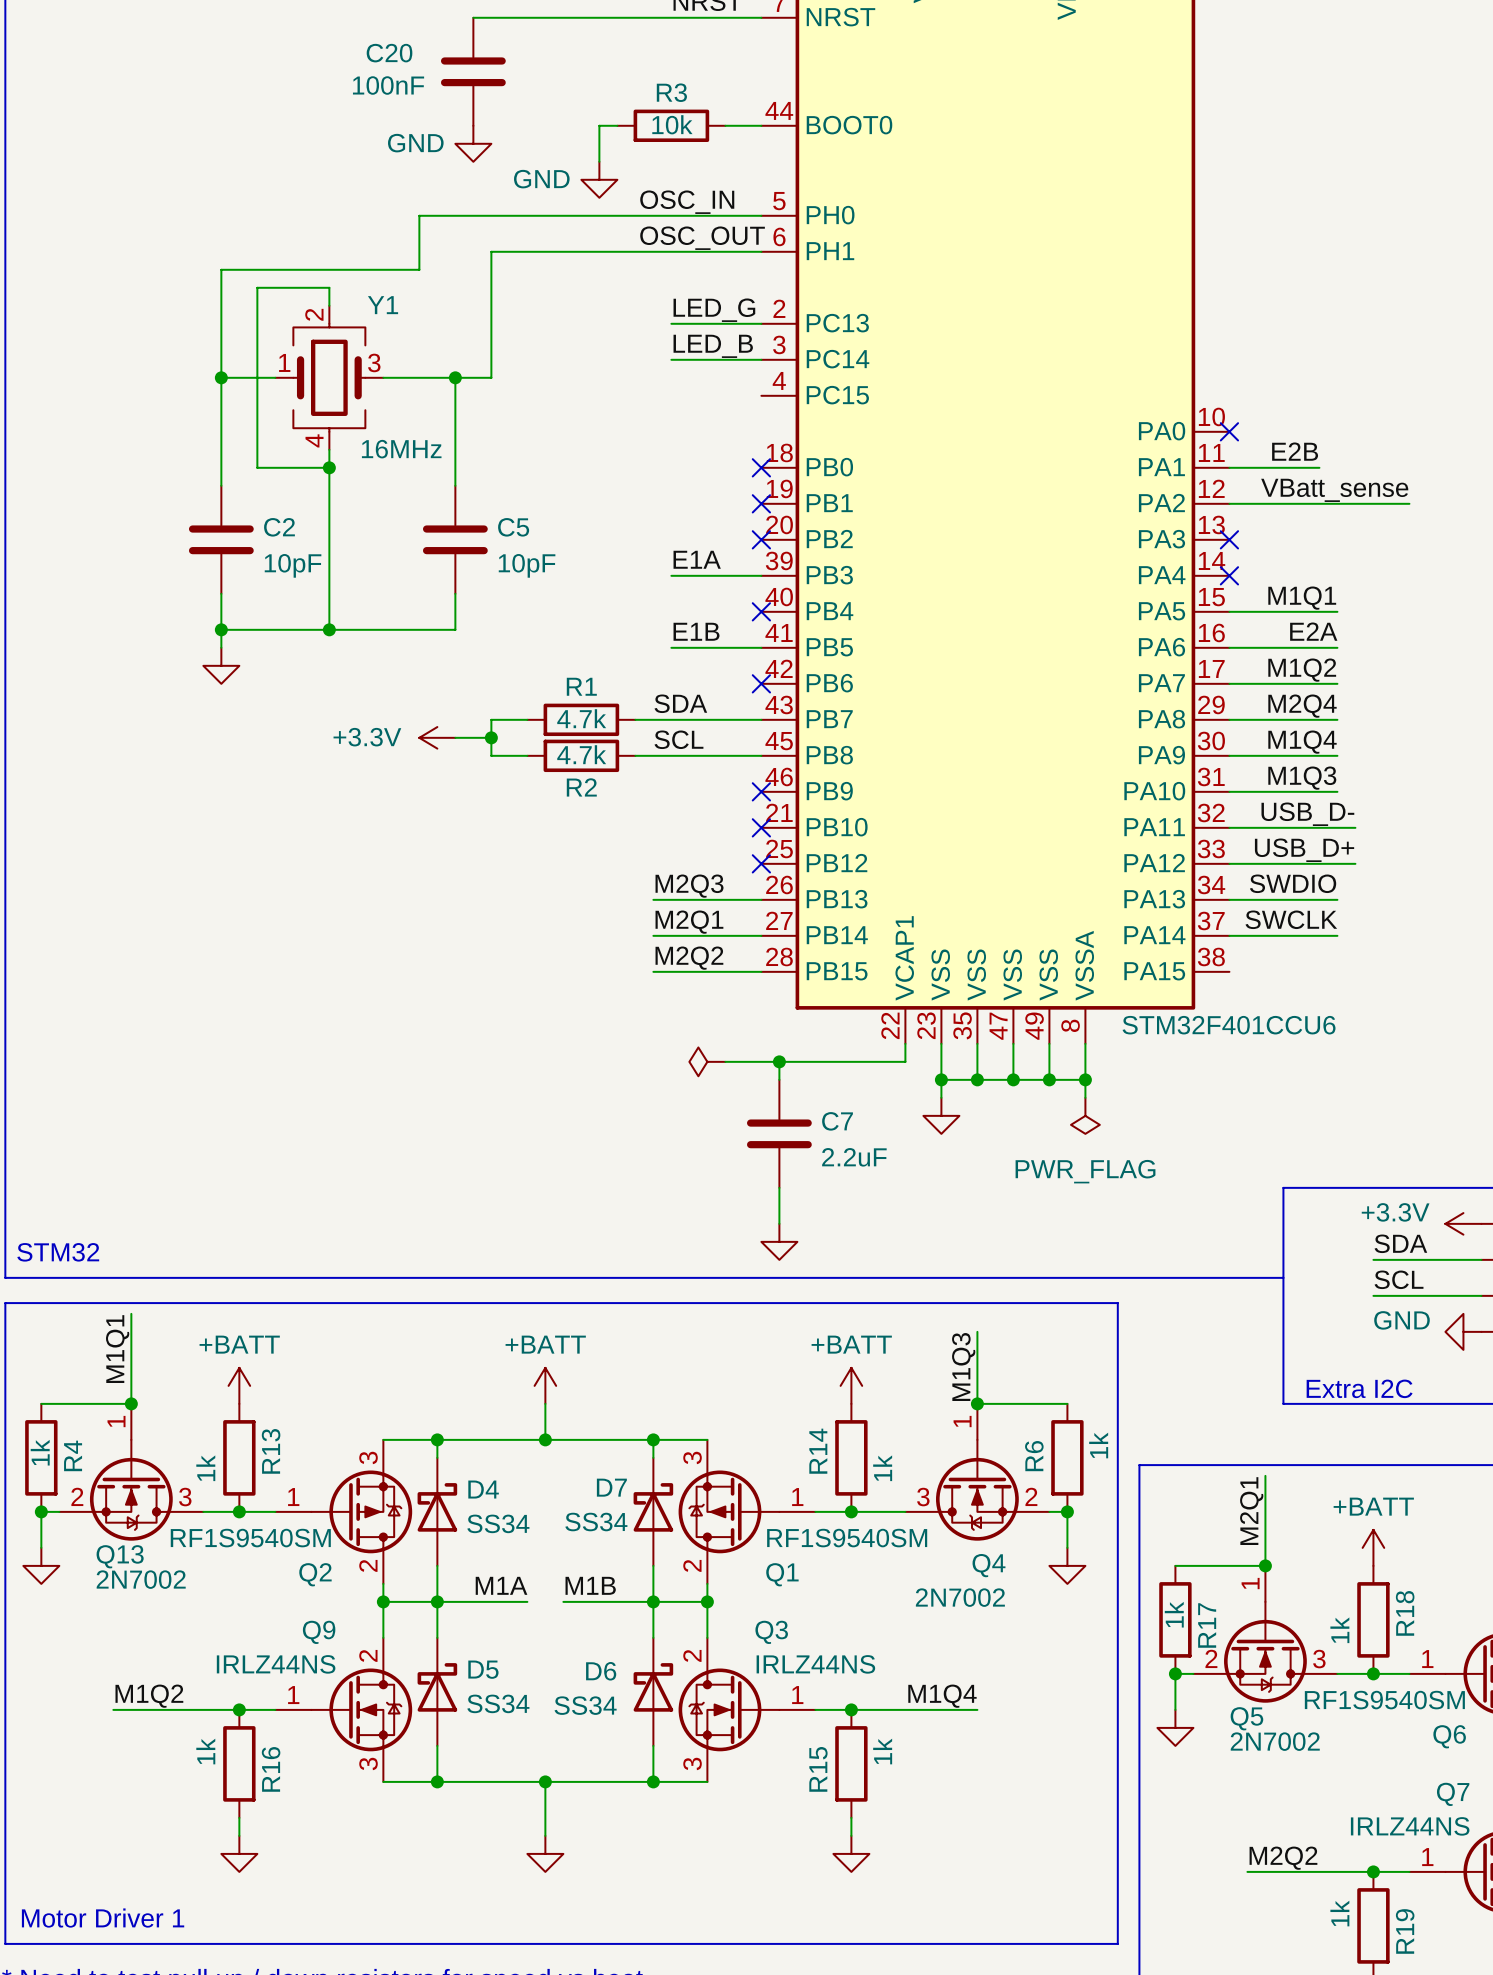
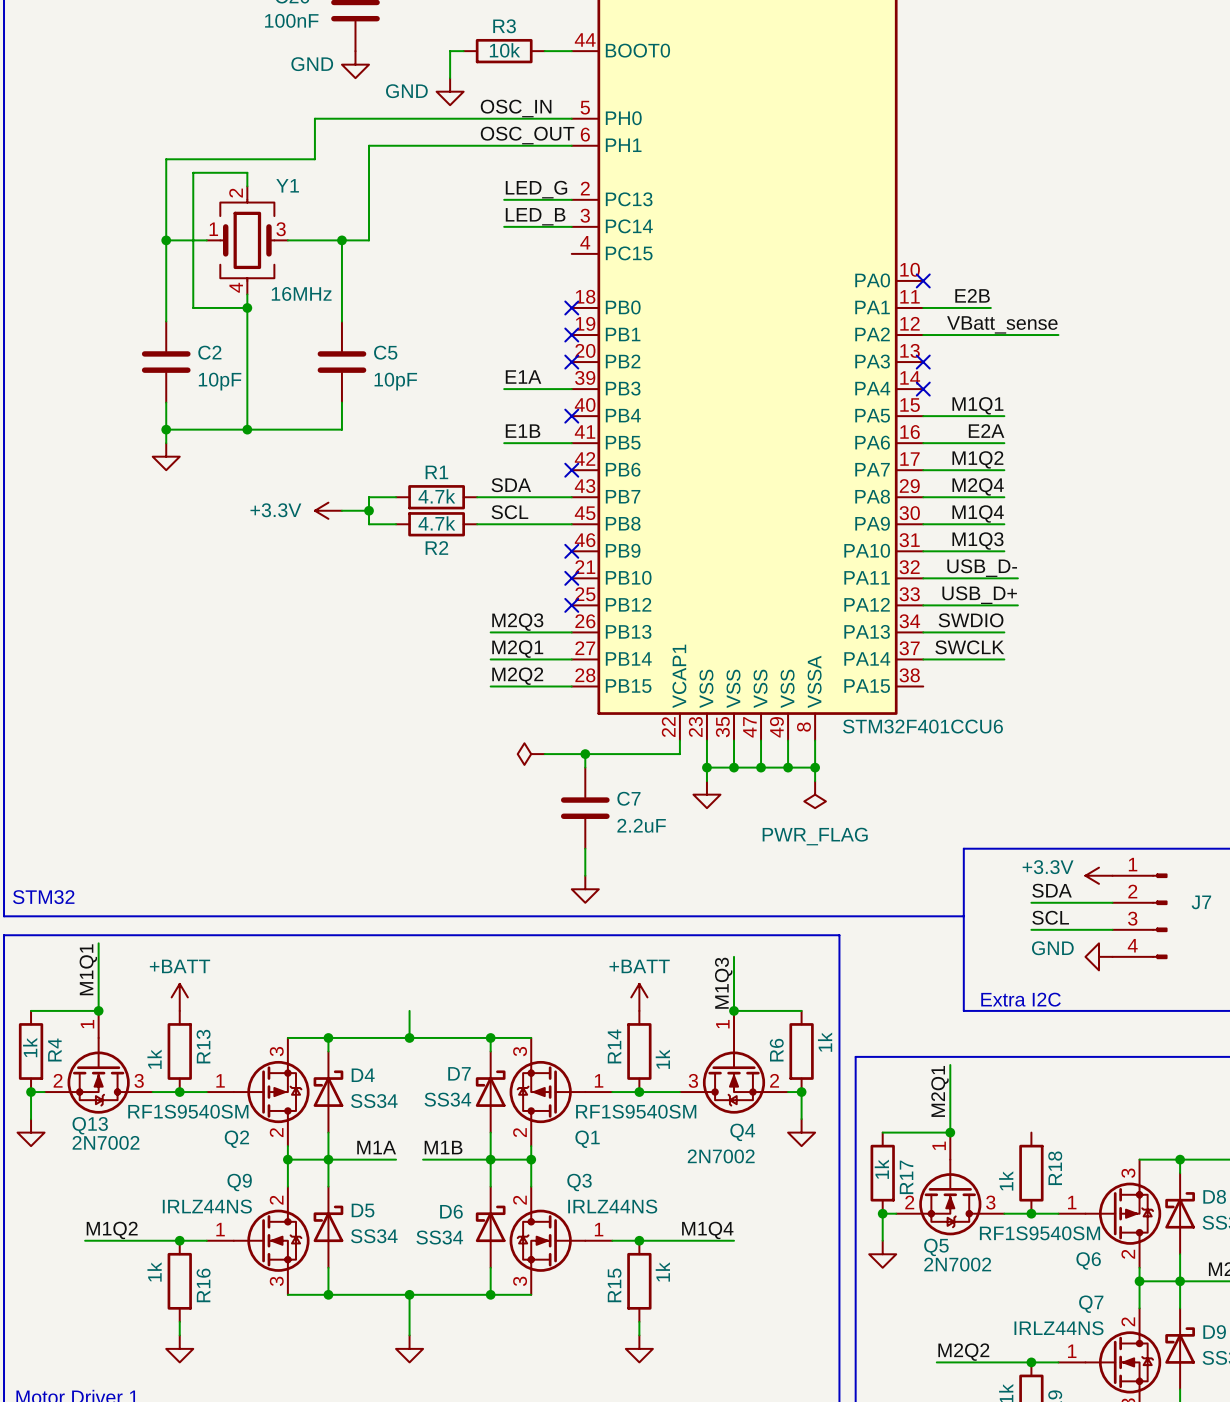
power symbol: +BATT (545, 1385) -> none
power symbol: +BATT (1373, 1547) -> none

